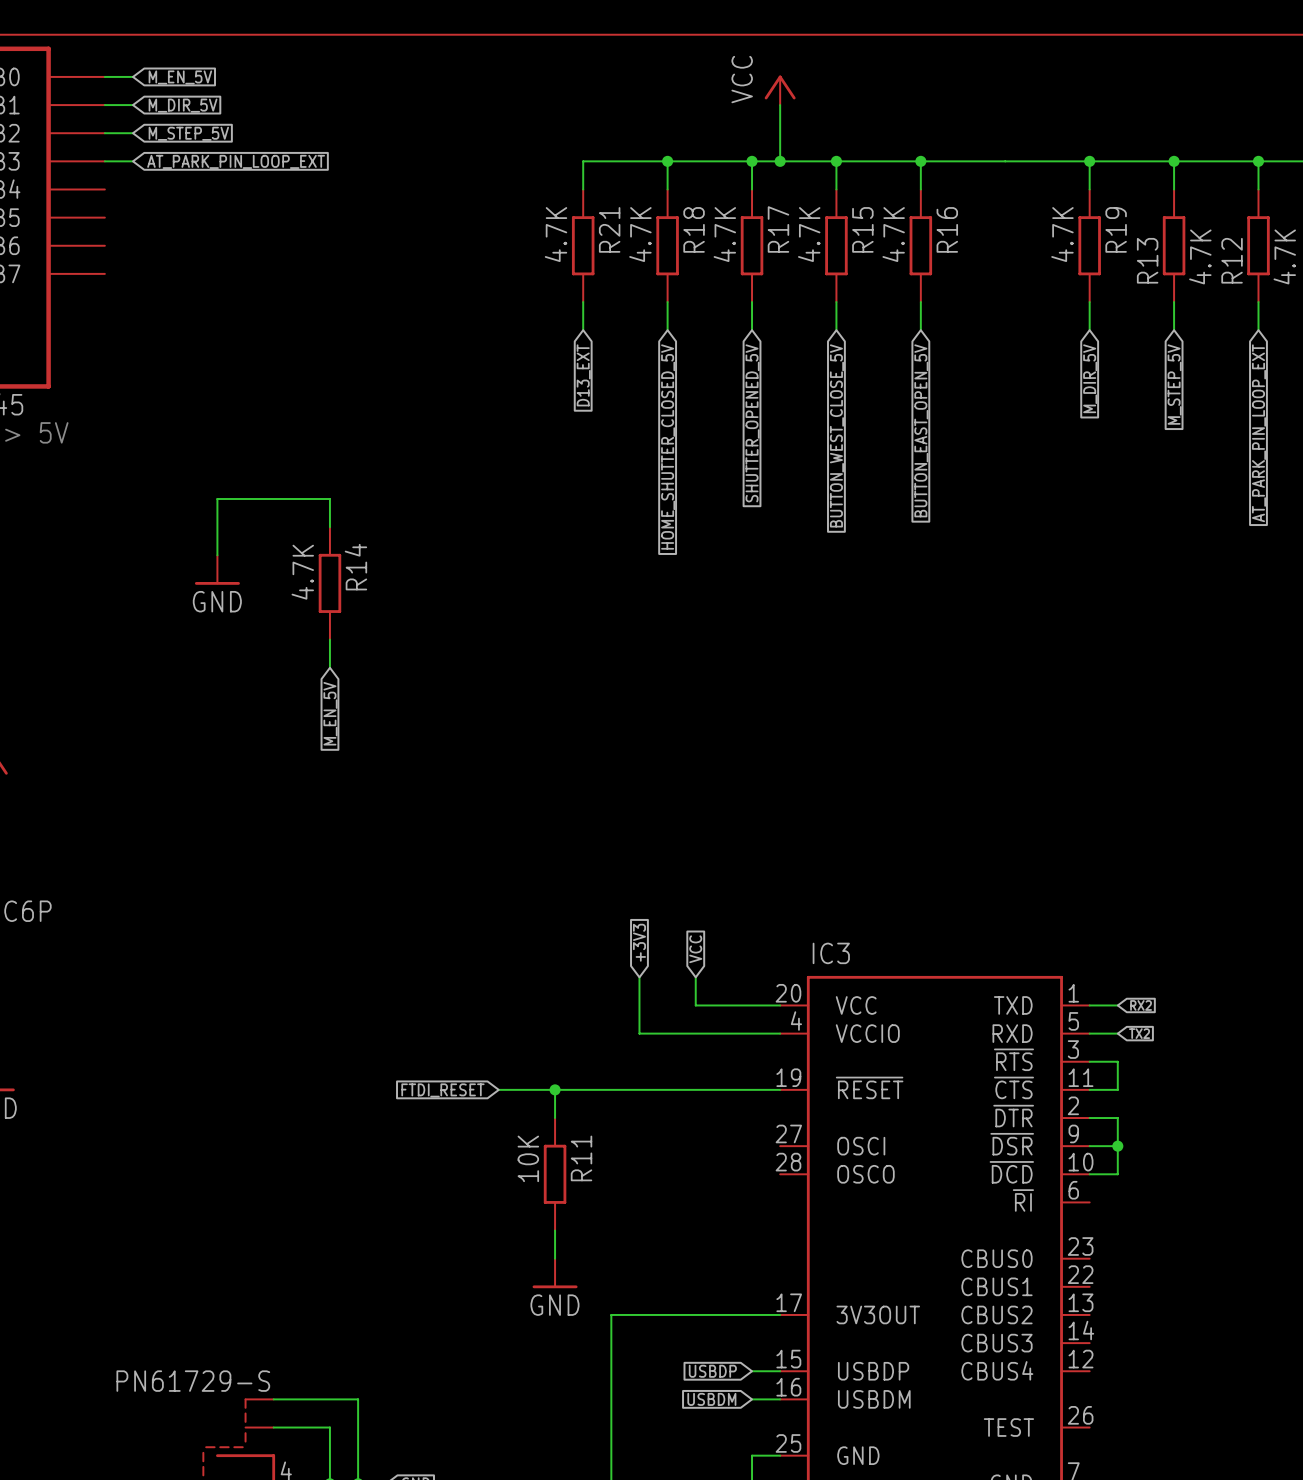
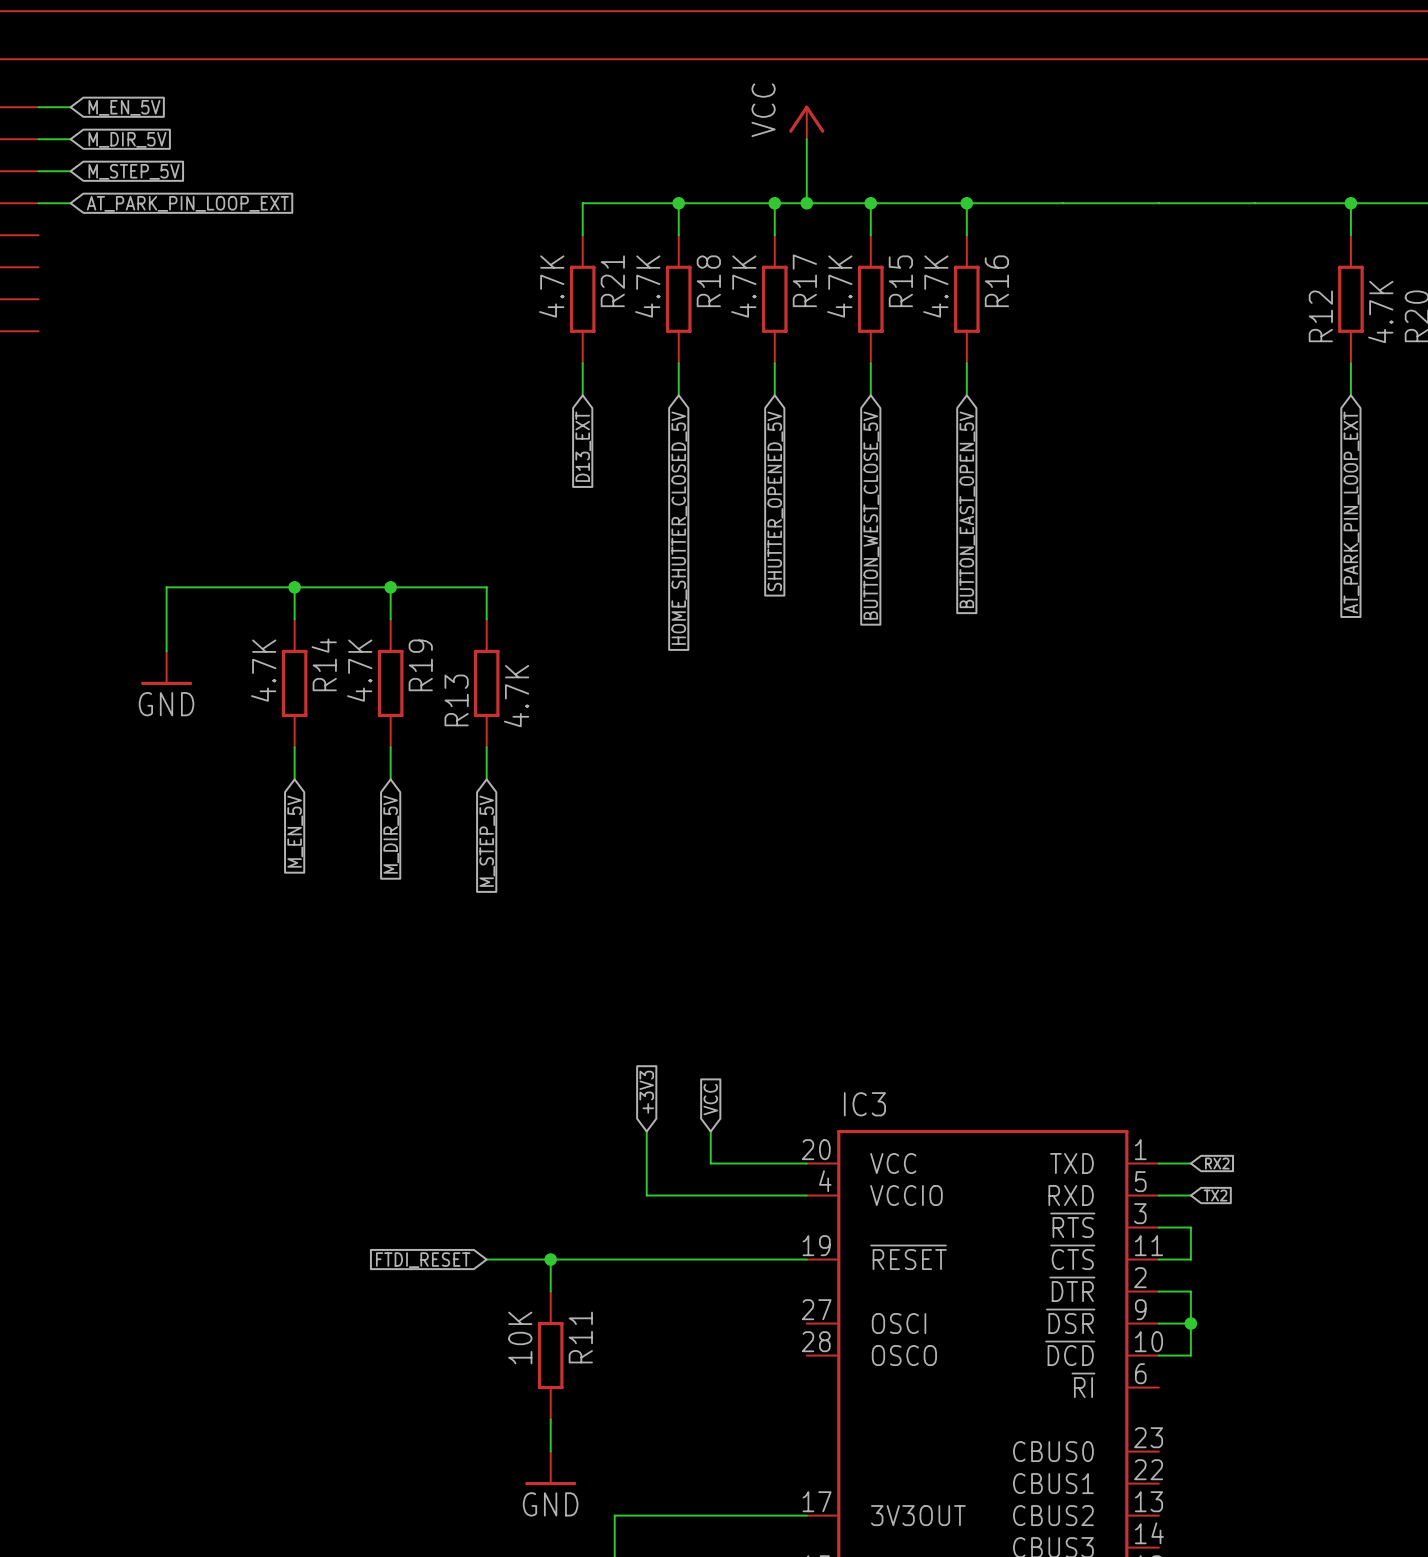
wire: (1089, 161) (1089, 189) -> none
junction: (1089, 161) -> none
wire: (1174, 161) (1174, 189) -> none
junction: (1174, 161) -> none
R19 position: (1089, 245) -> (390, 683)
R13 position: (1174, 245) -> (486, 683)
wire: (1089, 302) (1089, 330) -> none
wire: (1174, 302) (1174, 330) -> none
global label: M_DIR_5V (1090, 378) -> none
global label: M_STEP_5V (1174, 384) -> none
wire: none -> (294, 587) (486, 587) (486, 619)
junction: none -> (294, 587)
wire: none -> (390, 587) (390, 619)
junction: none -> (390, 587)
wire: none -> (390, 747) (390, 779)
wire: none -> (486, 747) (486, 779)
global label: none -> M_DIR_5V (391, 834)
global label: none -> M_STEP_5V (487, 841)

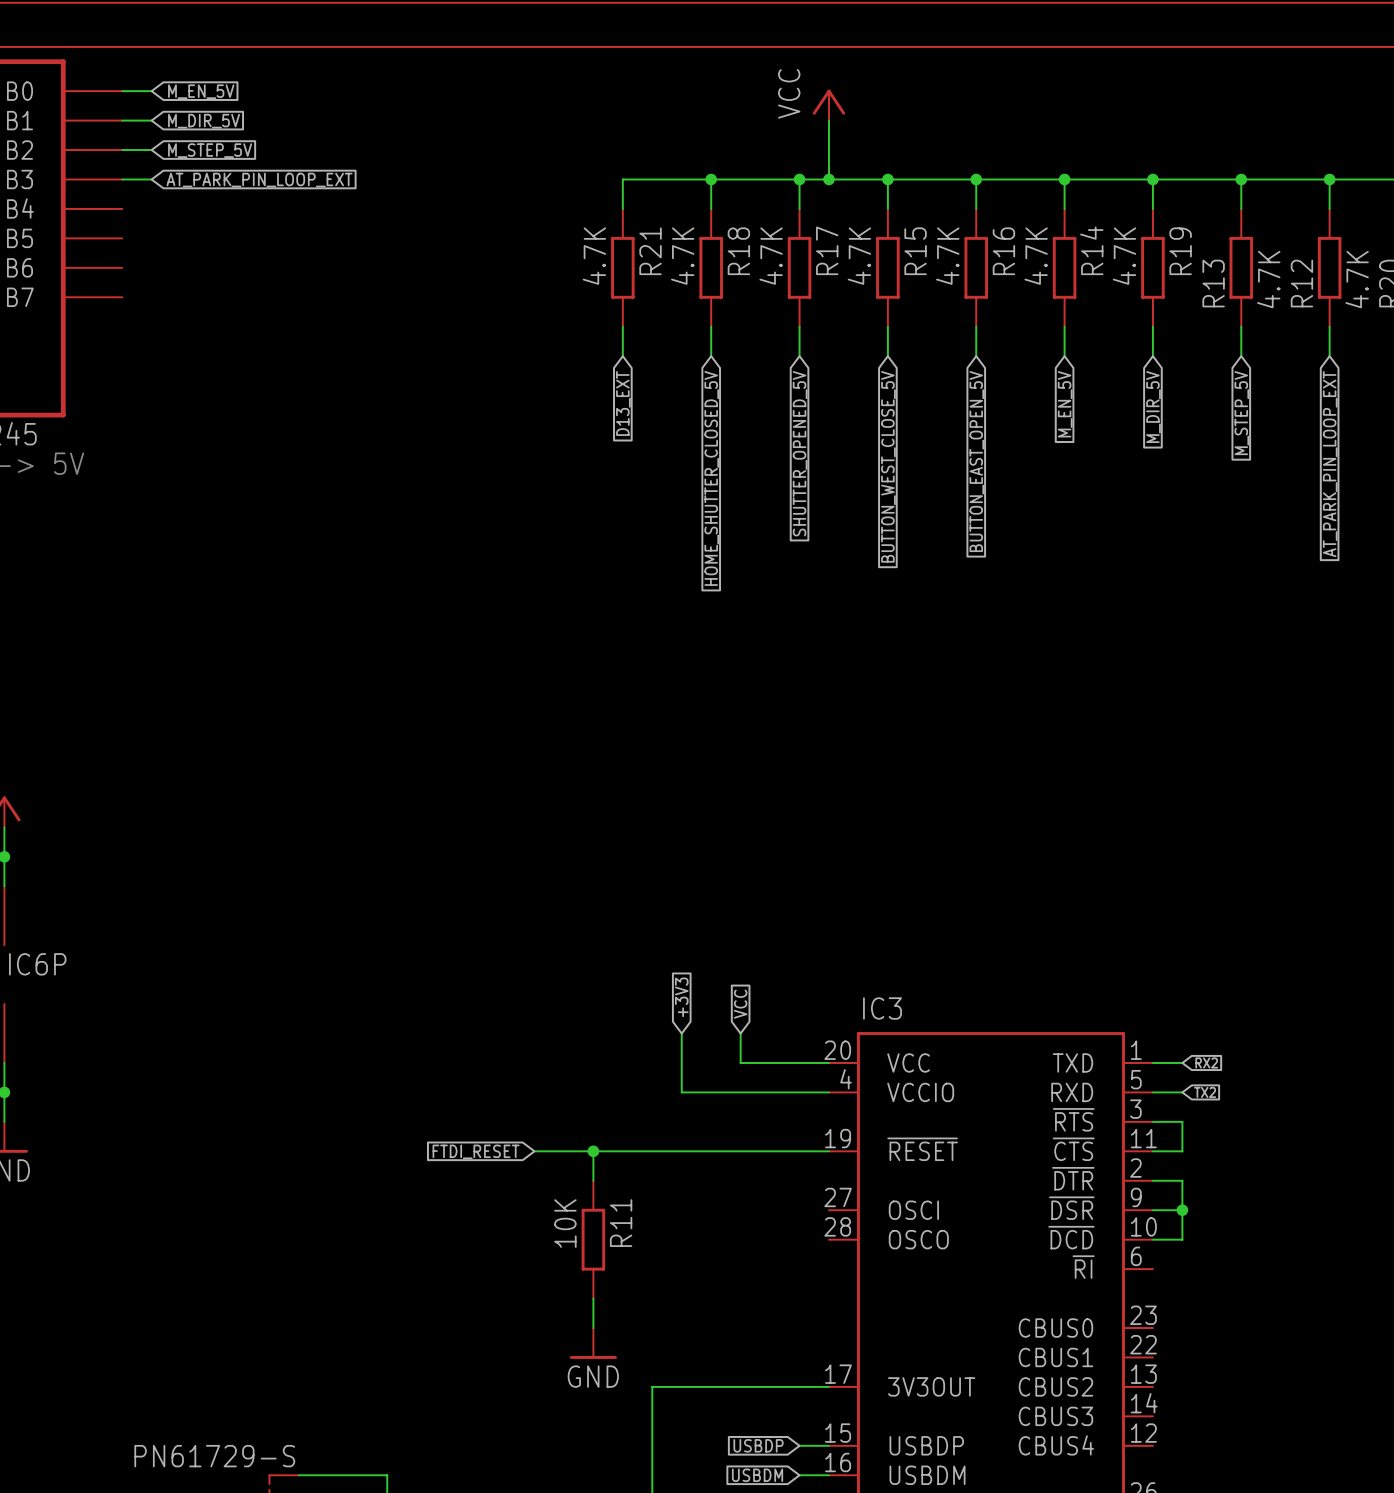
wire: none -> (1064, 179) (1064, 208)
junction: none -> (1064, 179)
wire: none -> (1152, 179) (1152, 208)
junction: none -> (1152, 179)
wire: none -> (1241, 179) (1241, 208)
junction: none -> (1241, 179)
wire: none -> (1064, 326) (1064, 356)
wire: none -> (1152, 326) (1152, 356)
wire: none -> (1241, 326) (1241, 356)
global label: none -> M_EN_5V (1065, 404)
global label: none -> M_DIR_5V (1153, 407)
global label: none -> M_STEP_5V (1241, 413)
wire: (294, 587) (294, 619) -> none
junction: (294, 587) -> none
wire: (390, 587) (390, 619) -> none
junction: (390, 587) -> none
wire: (486, 619) (486, 587) (166, 587) (166, 651) -> none
power symbol: GND (166, 668) -> none
R14 position: (294, 683) -> (1064, 267)
R19 position: (390, 683) -> (1152, 267)
R13 position: (486, 683) -> (1241, 267)
wire: (294, 747) (294, 779) -> none
wire: (390, 747) (390, 779) -> none
wire: (486, 747) (486, 779) -> none
global label: M_EN_5V (295, 831) -> none
global label: M_DIR_5V (391, 834) -> none
global label: M_STEP_5V (487, 841) -> none

